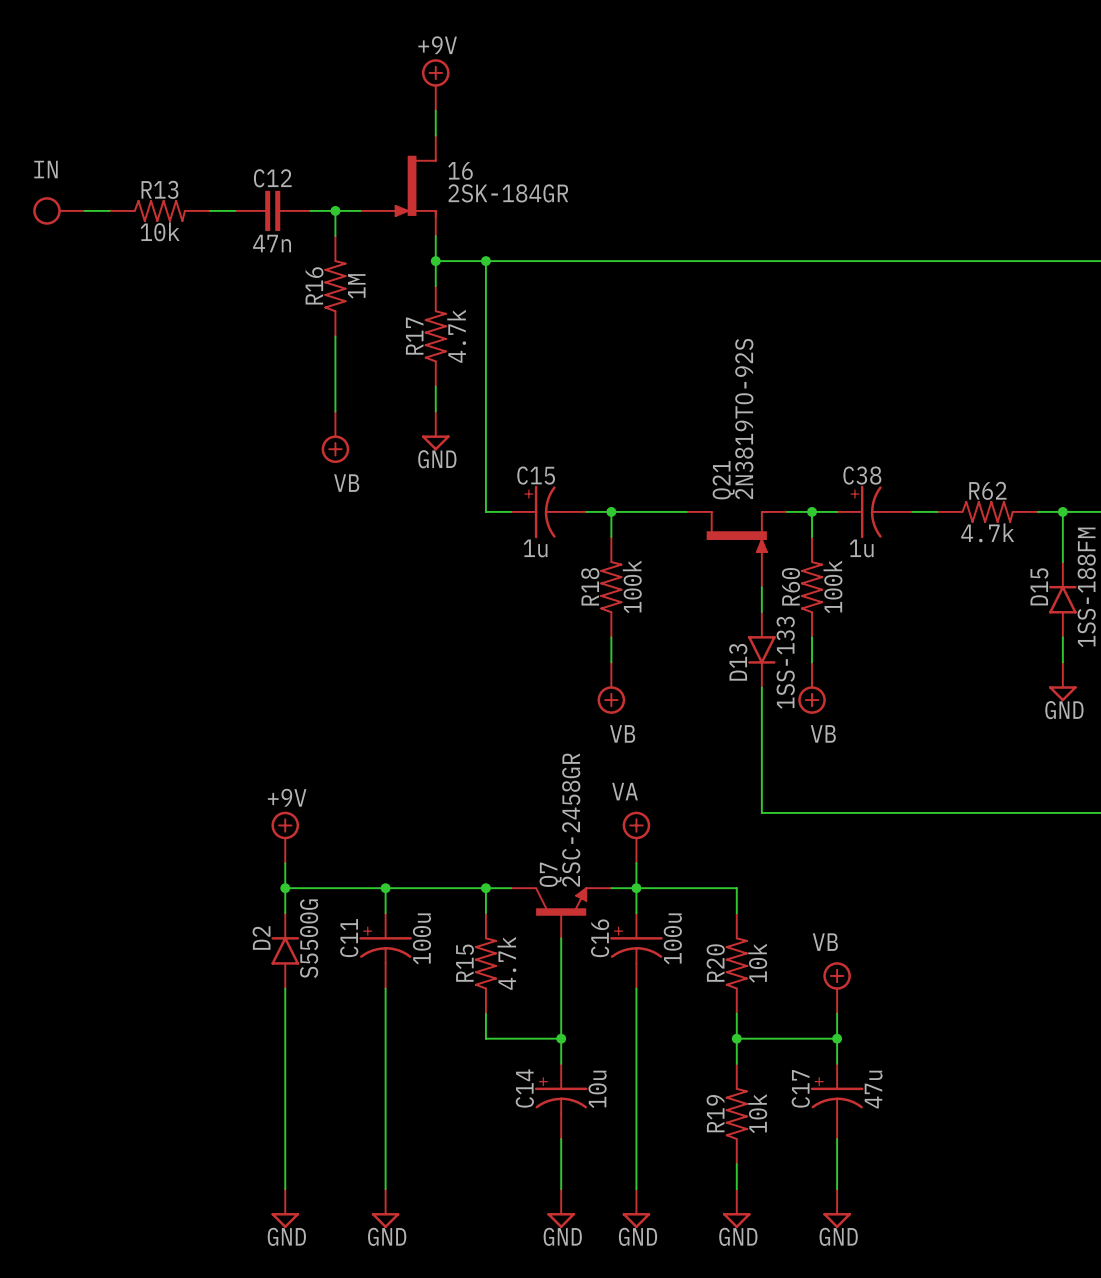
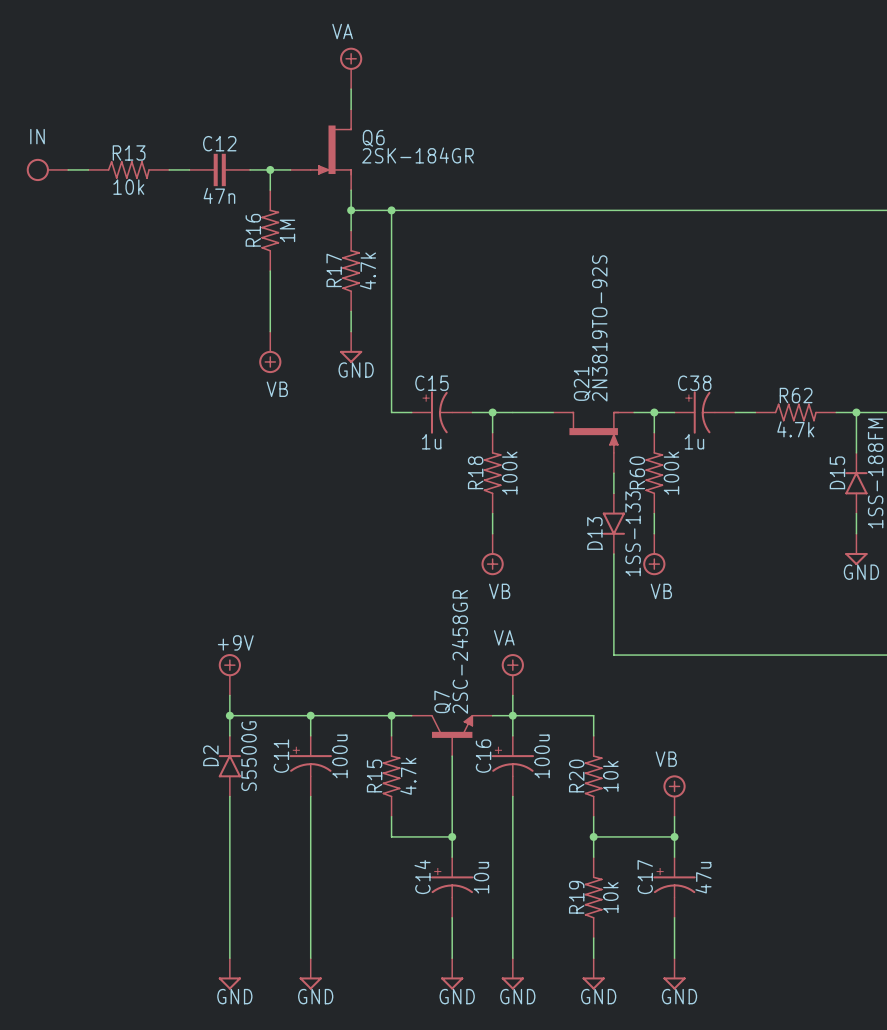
power symbol: +9V (435, 84) -> VA (351, 68)
16 name: 16 (460, 170) -> Q6 (373, 138)

